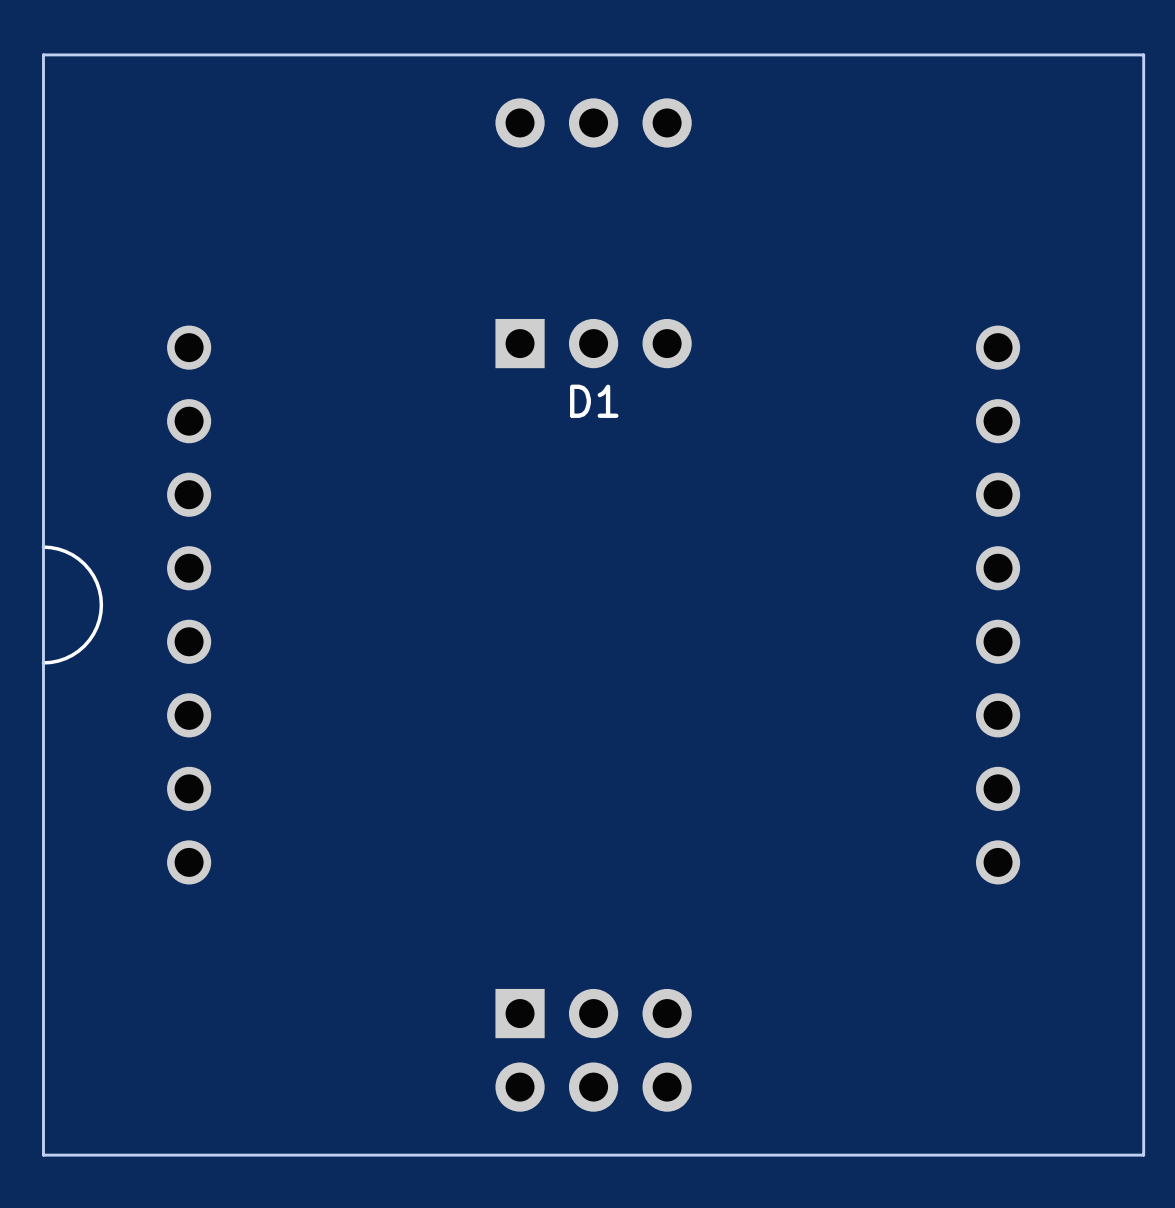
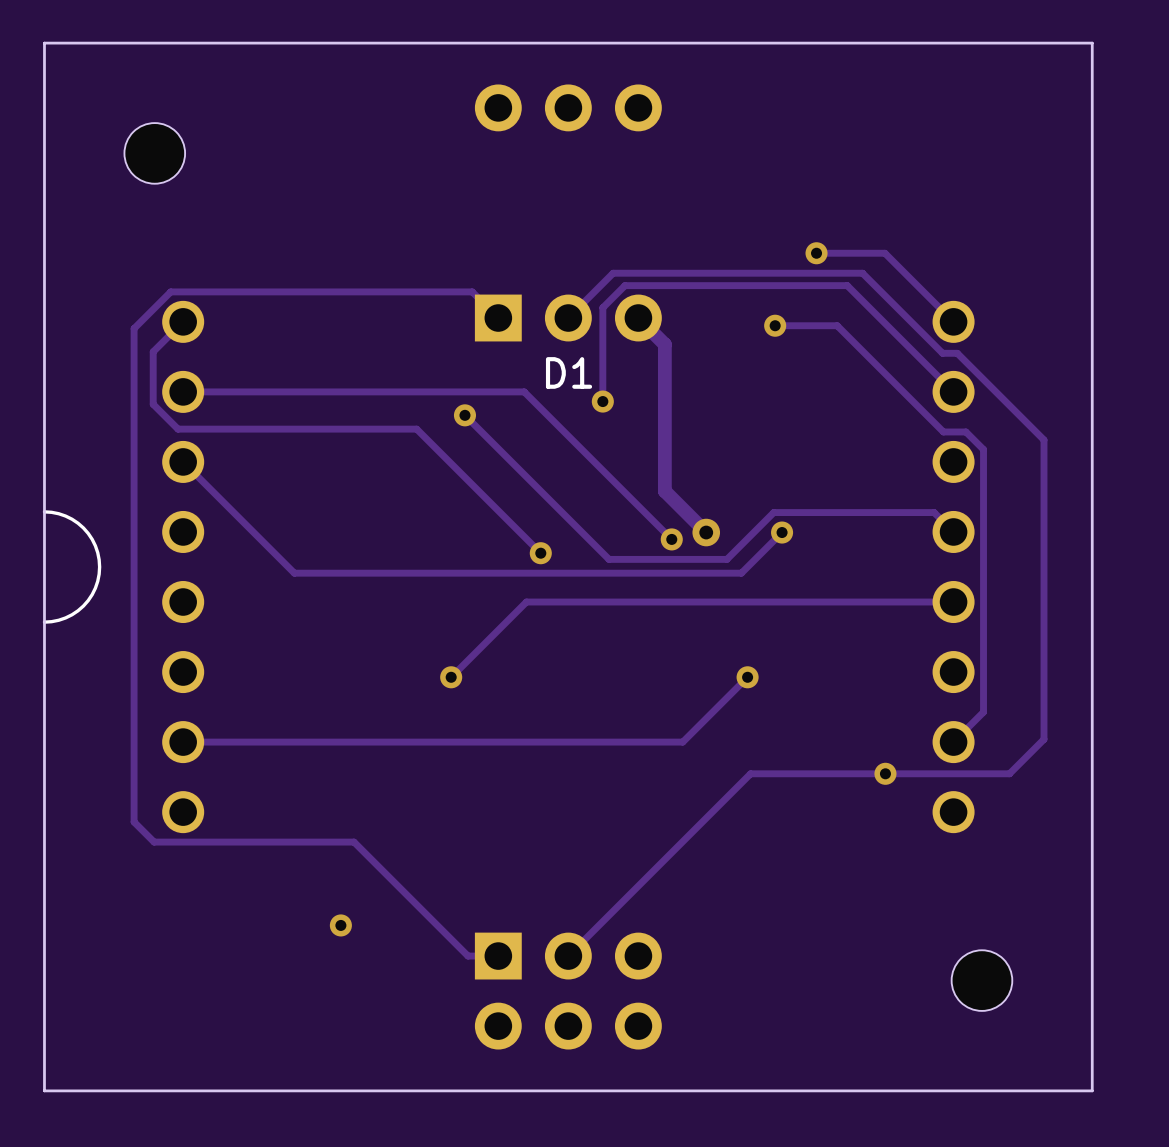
part: none -> (154, 153)
track: none -> (816, 253) (884, 253) (953, 321)
via: none -> (816, 253)
track: none -> (498, 318) (472, 291) (170, 291) (134, 328) (134, 822) (154, 842) (354, 842) (468, 956) (498, 956)
track: none -> (568, 318) (613, 273) (862, 273) (942, 353) (957, 353) (1044, 439) (1044, 739) (1009, 773) (750, 773) (568, 956)
track: none -> (638, 318) (664, 344) (664, 491) (706, 532)
track: none -> (183, 321) (153, 351) (153, 404) (178, 429) (416, 429) (540, 553)
track: none -> (775, 325) (837, 325) (943, 431) (965, 431) (983, 449) (983, 712) (953, 742)
via: none -> (775, 325)
track: none -> (183, 391) (524, 391) (671, 539)
track: none -> (953, 391) (847, 285) (624, 285) (602, 307) (602, 401)
via: none -> (602, 401)
track: none -> (464, 415) (609, 559) (726, 559) (773, 512) (934, 512) (953, 531)
via: none -> (464, 415)
track: none -> (183, 461) (294, 573) (741, 573) (782, 532)
via: none -> (706, 532)
via: none -> (782, 532)
via: none -> (671, 539)
via: none -> (540, 553)
track: none -> (953, 602) (526, 602) (451, 677)
via: none -> (451, 677)
track: none -> (747, 677) (682, 742) (183, 742)
via: none -> (747, 677)
via: none -> (885, 773)
via: none -> (340, 925)
part: none -> (981, 980)

